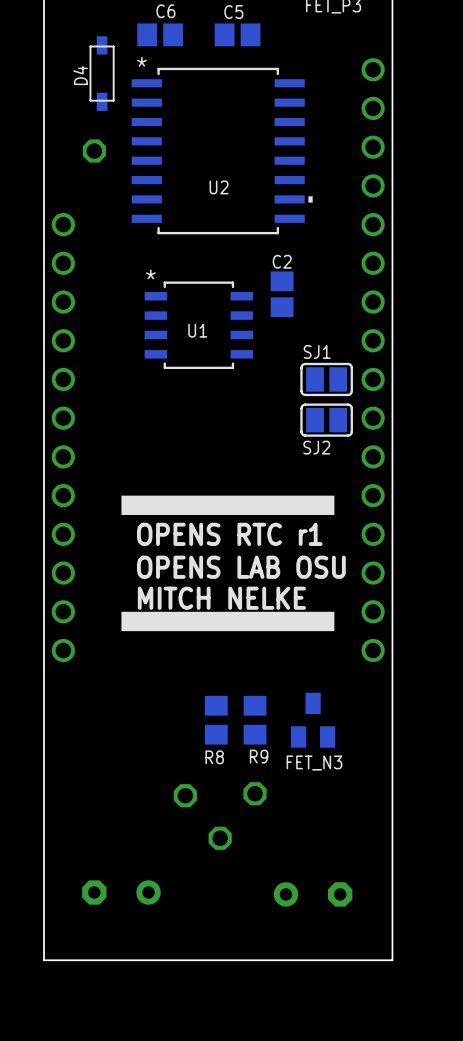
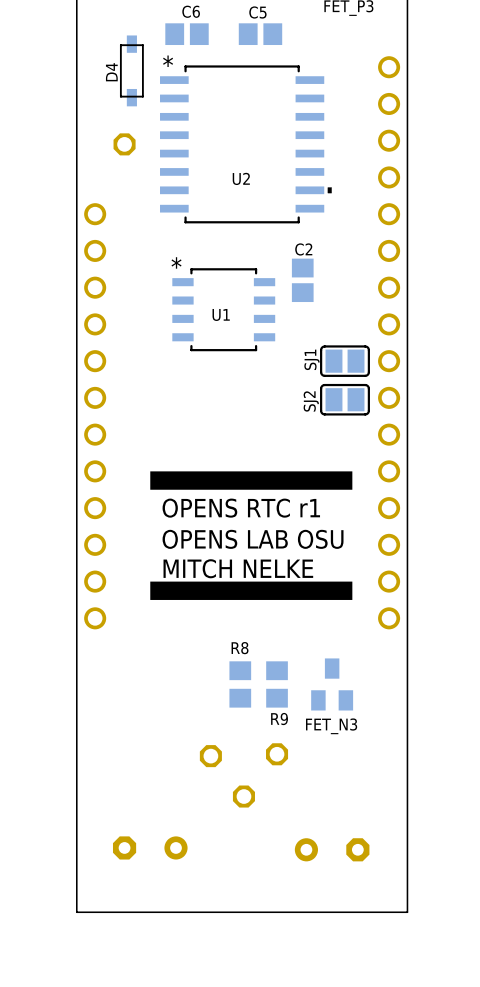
SJ1 name rotation: 0° (317, 351) -> 90° counterclockwise (311, 359)
SJ1 name position: SJ1 (317, 351) -> SJ1 (311, 359)
SJ2 name rotation: 0° (316, 447) -> 90° counterclockwise (311, 401)
SJ2 name position: SJ2 (316, 447) -> SJ2 (311, 401)
R8 name position: R8 (214, 757) -> R8 (240, 648)

